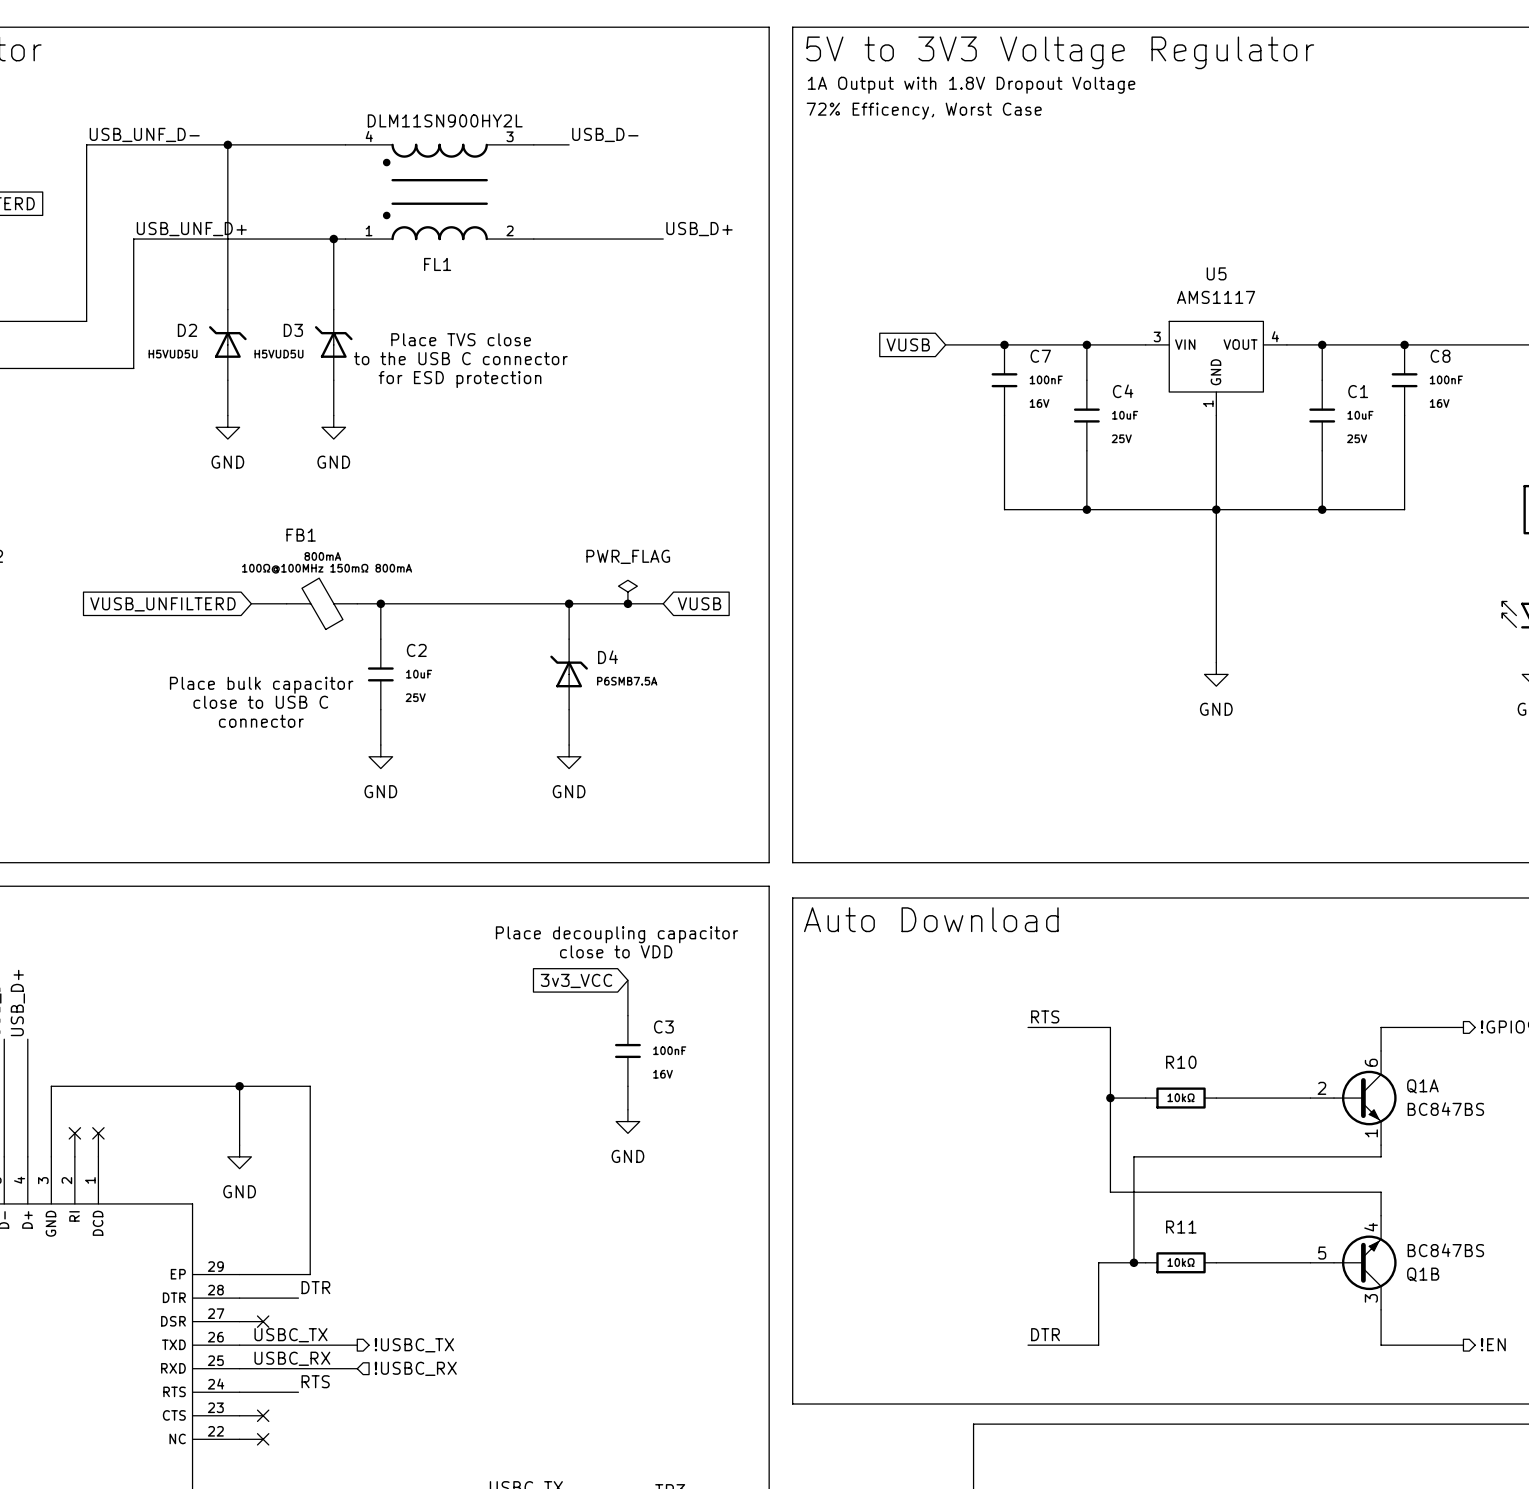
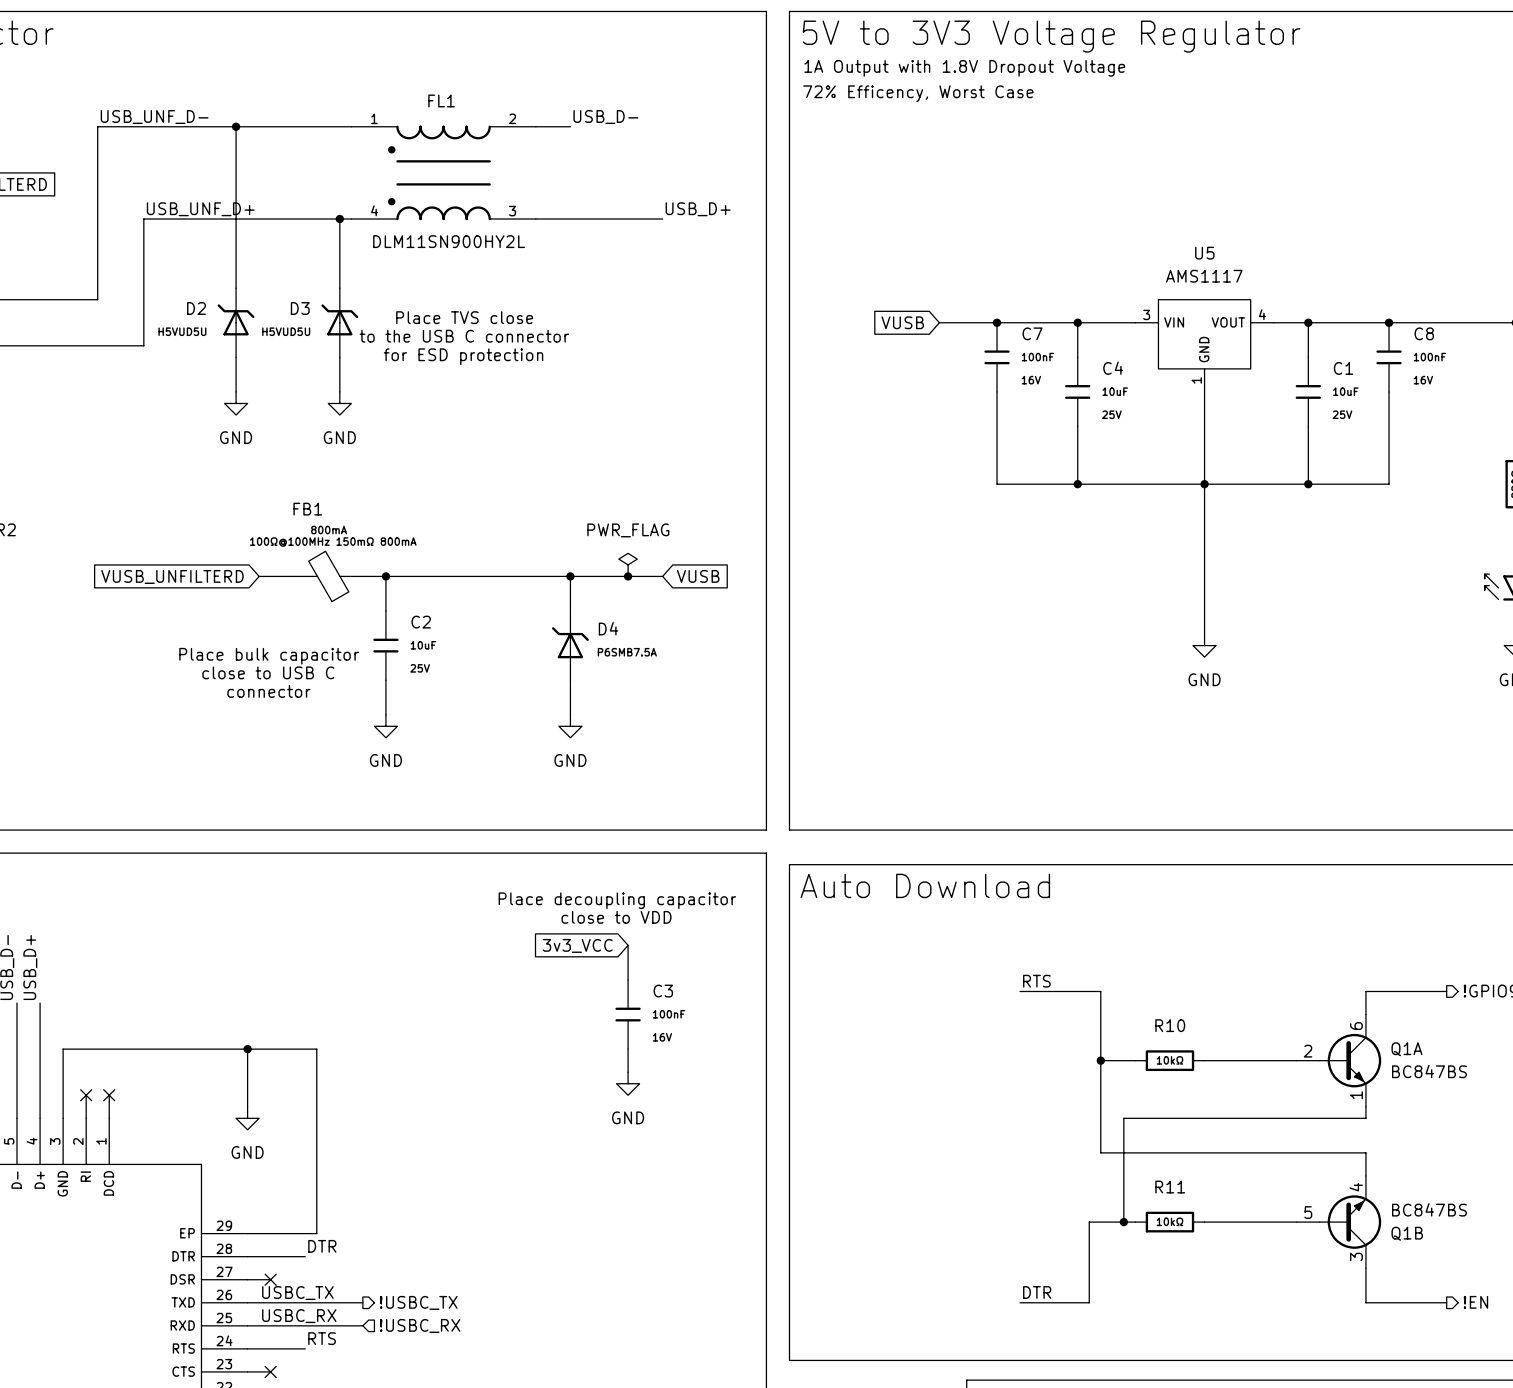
FL1 flip: as is (435, 191) -> up-down (439, 172)

